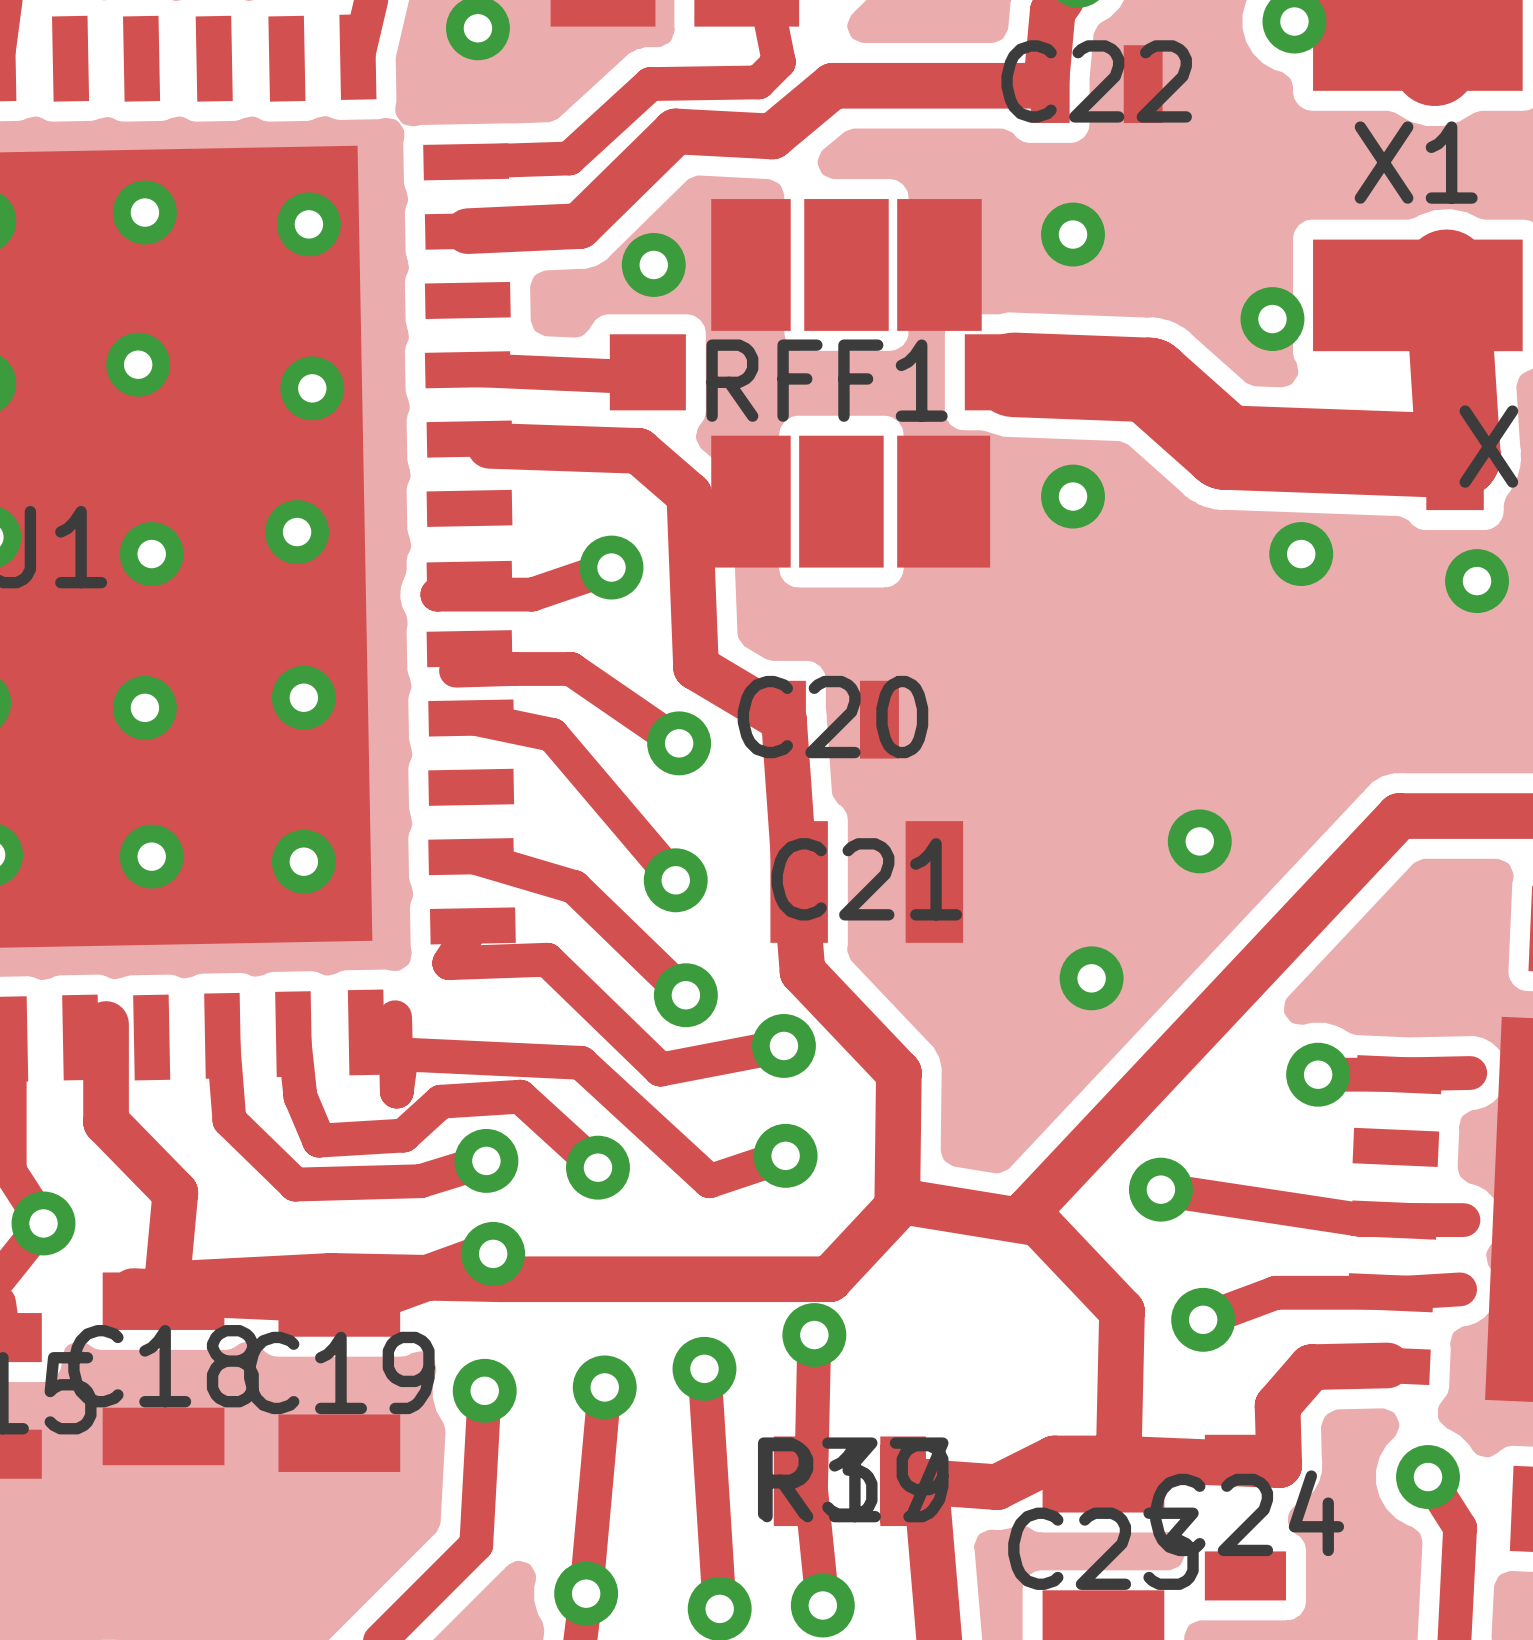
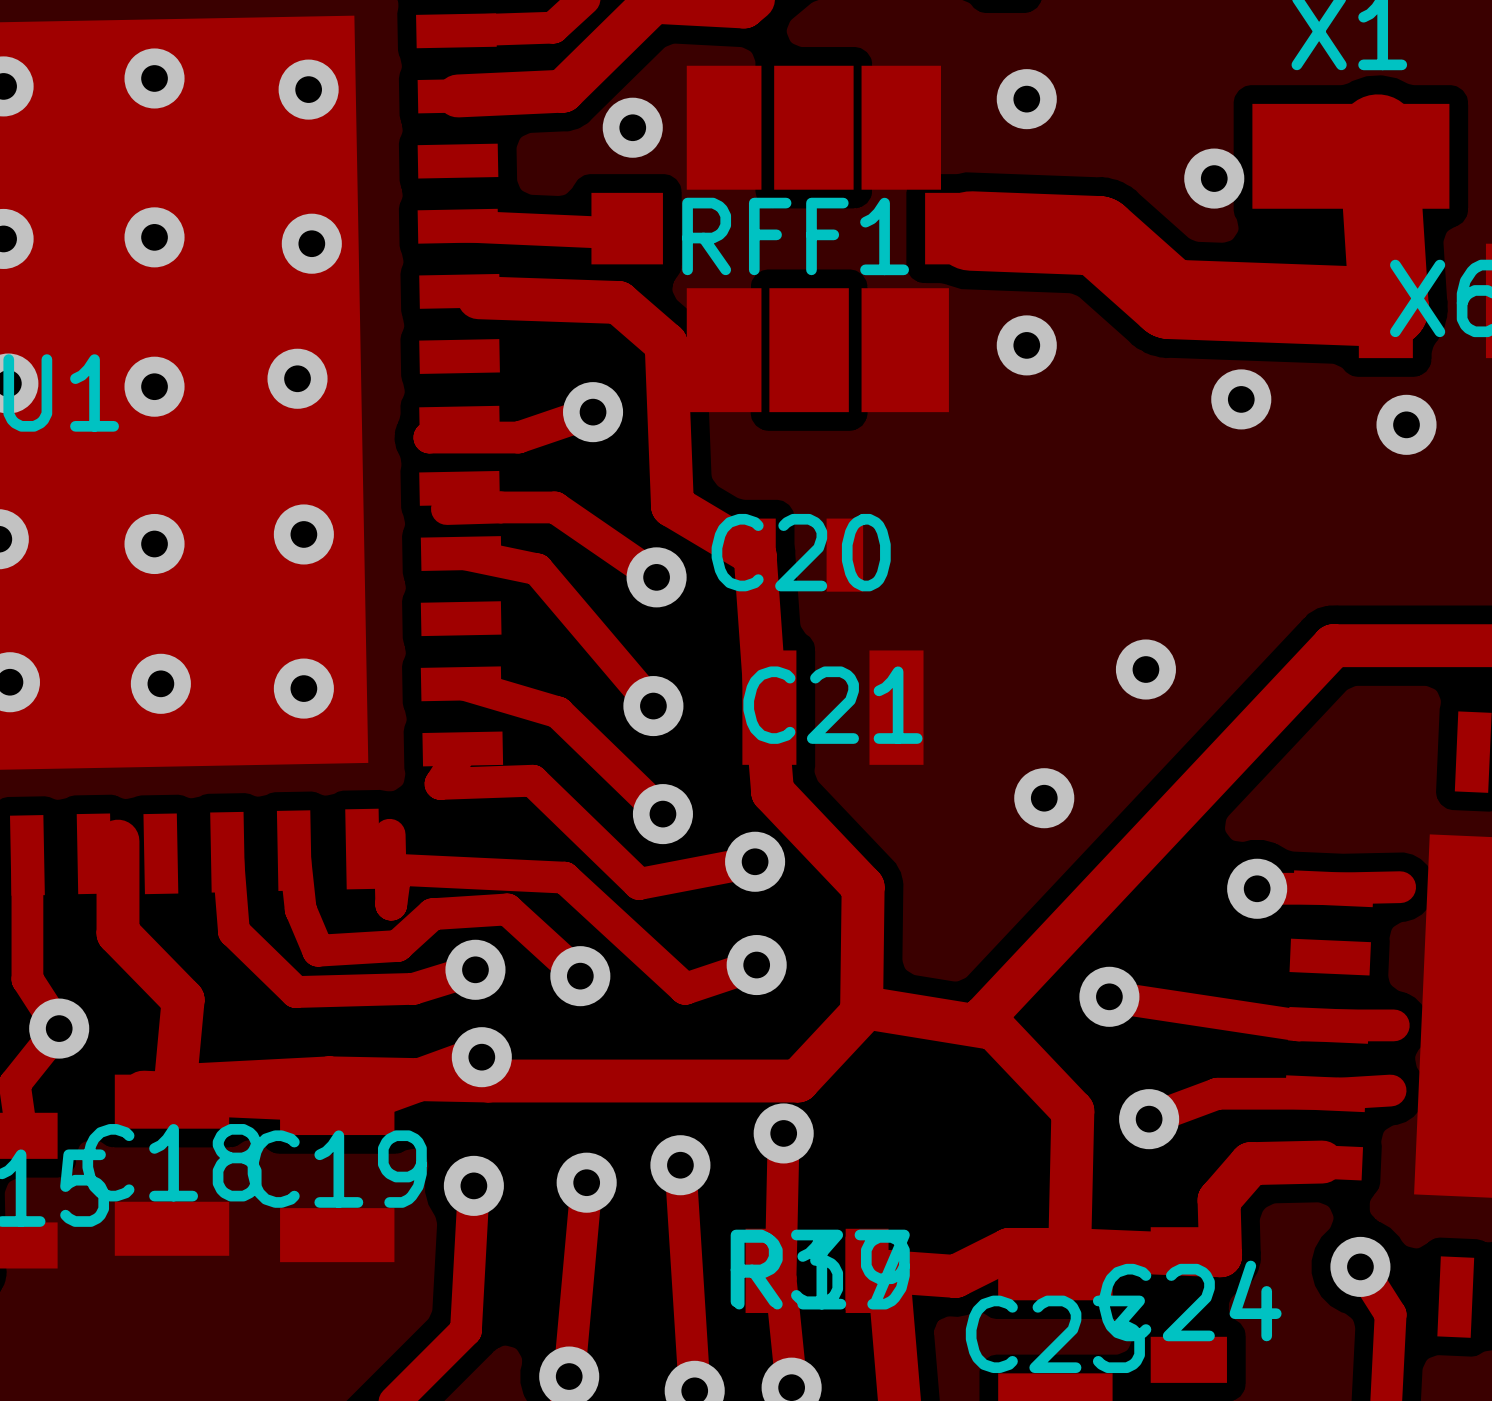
via position: (138, 364) -> (154, 237)
via position: (151, 554) -> (154, 386)

